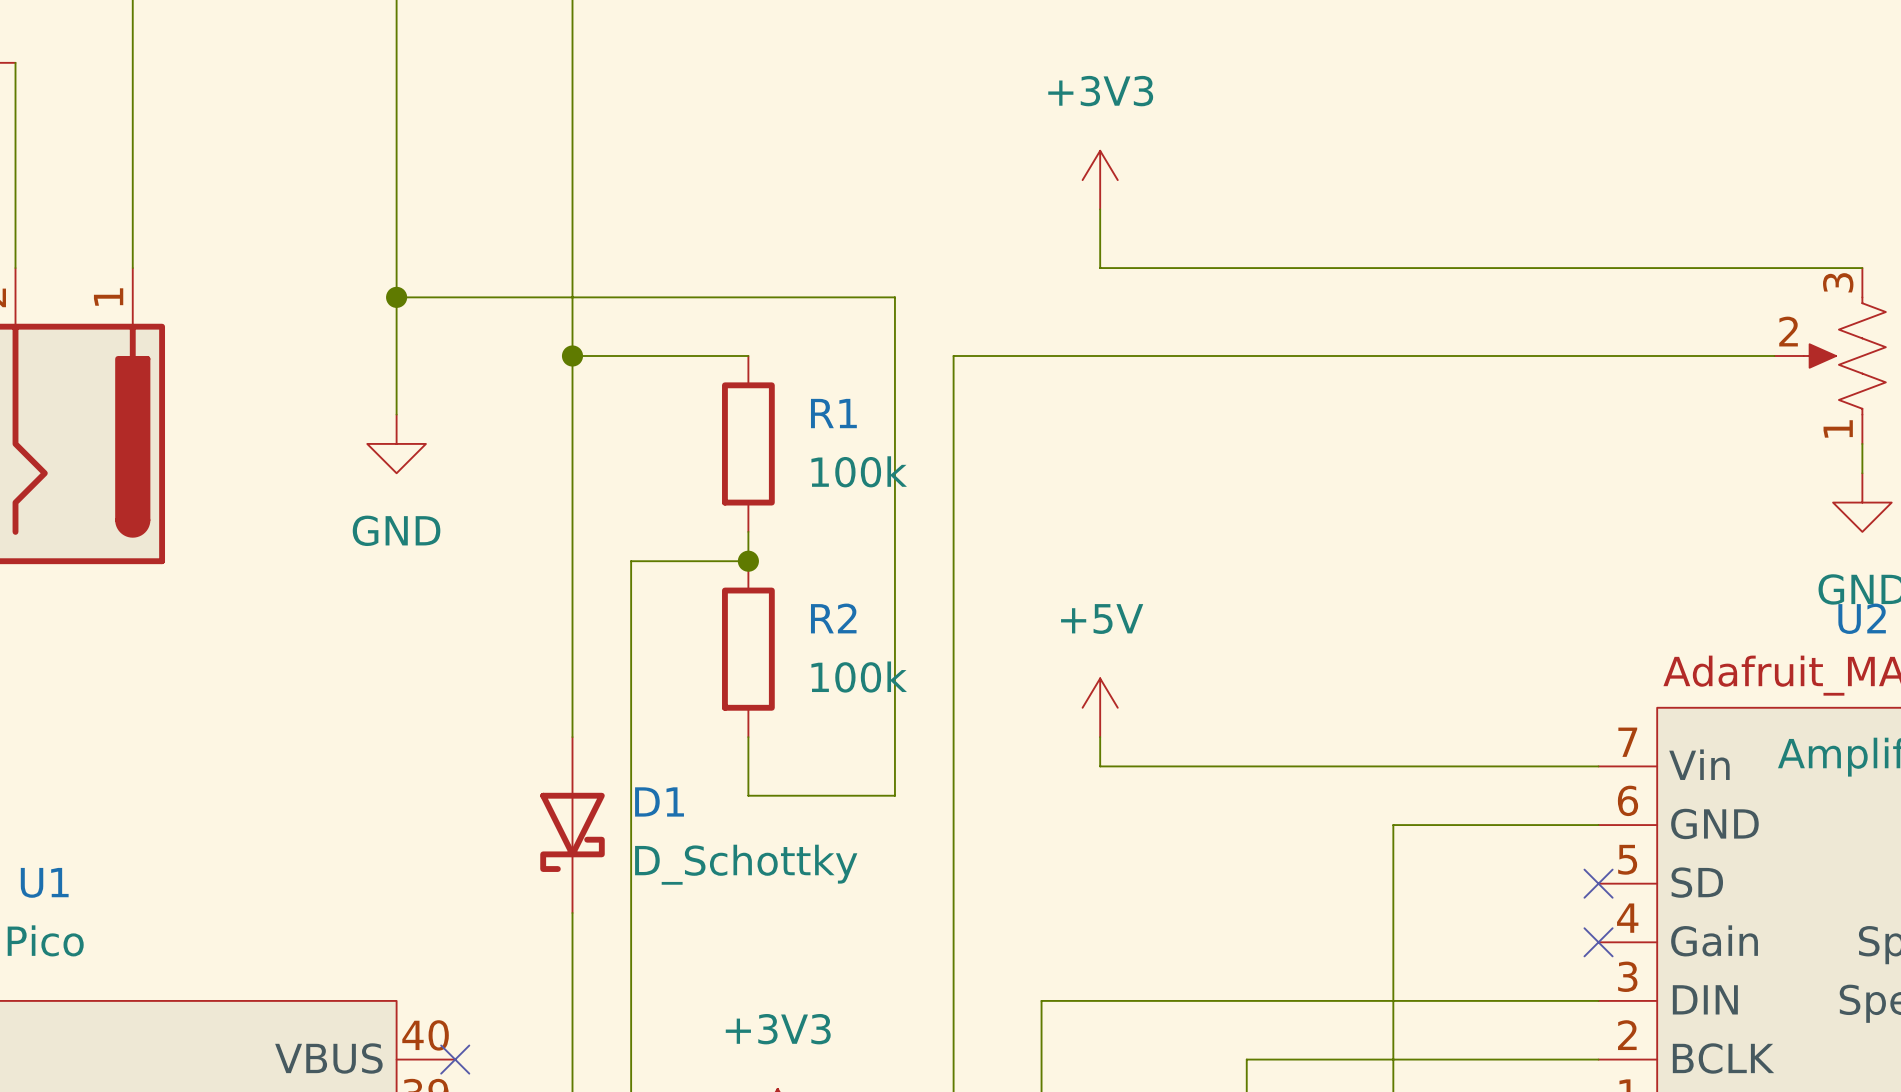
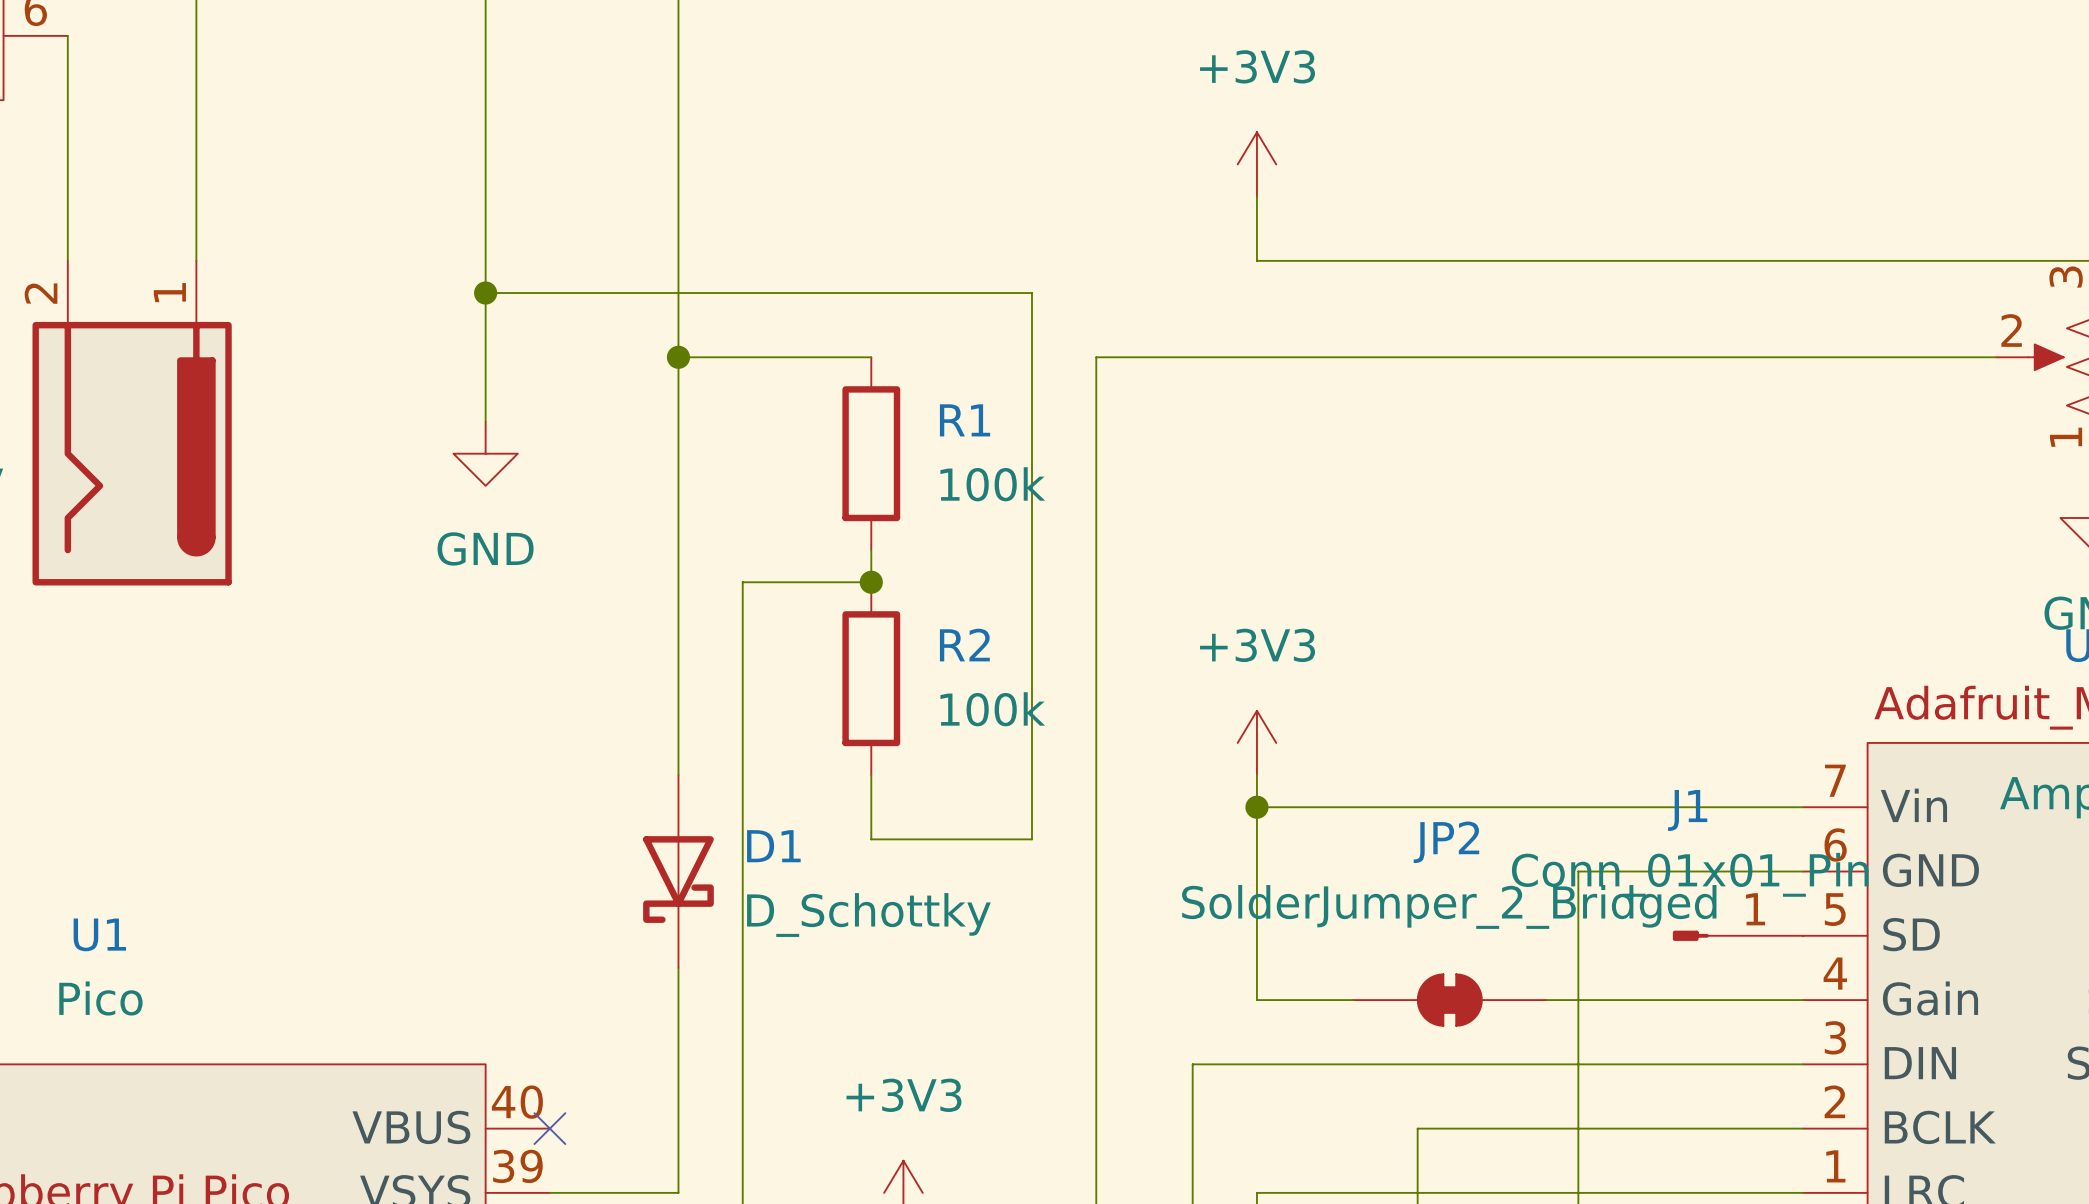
power symbol: +5V (1100, 707) -> +3V3 (1256, 742)
wire: none -> (1256, 807) (1256, 1000) (1353, 1000)
junction: none -> (1256, 807)
J1: none -> Conn_01x01_Pin (1738, 935)
no-connect mark: (1598, 883) -> none
JP2: none -> SolderJumper_2_Bridged (1449, 1000)
wire: none -> (1546, 1000) (1803, 1000)
no-connect mark: (1598, 942) -> none

